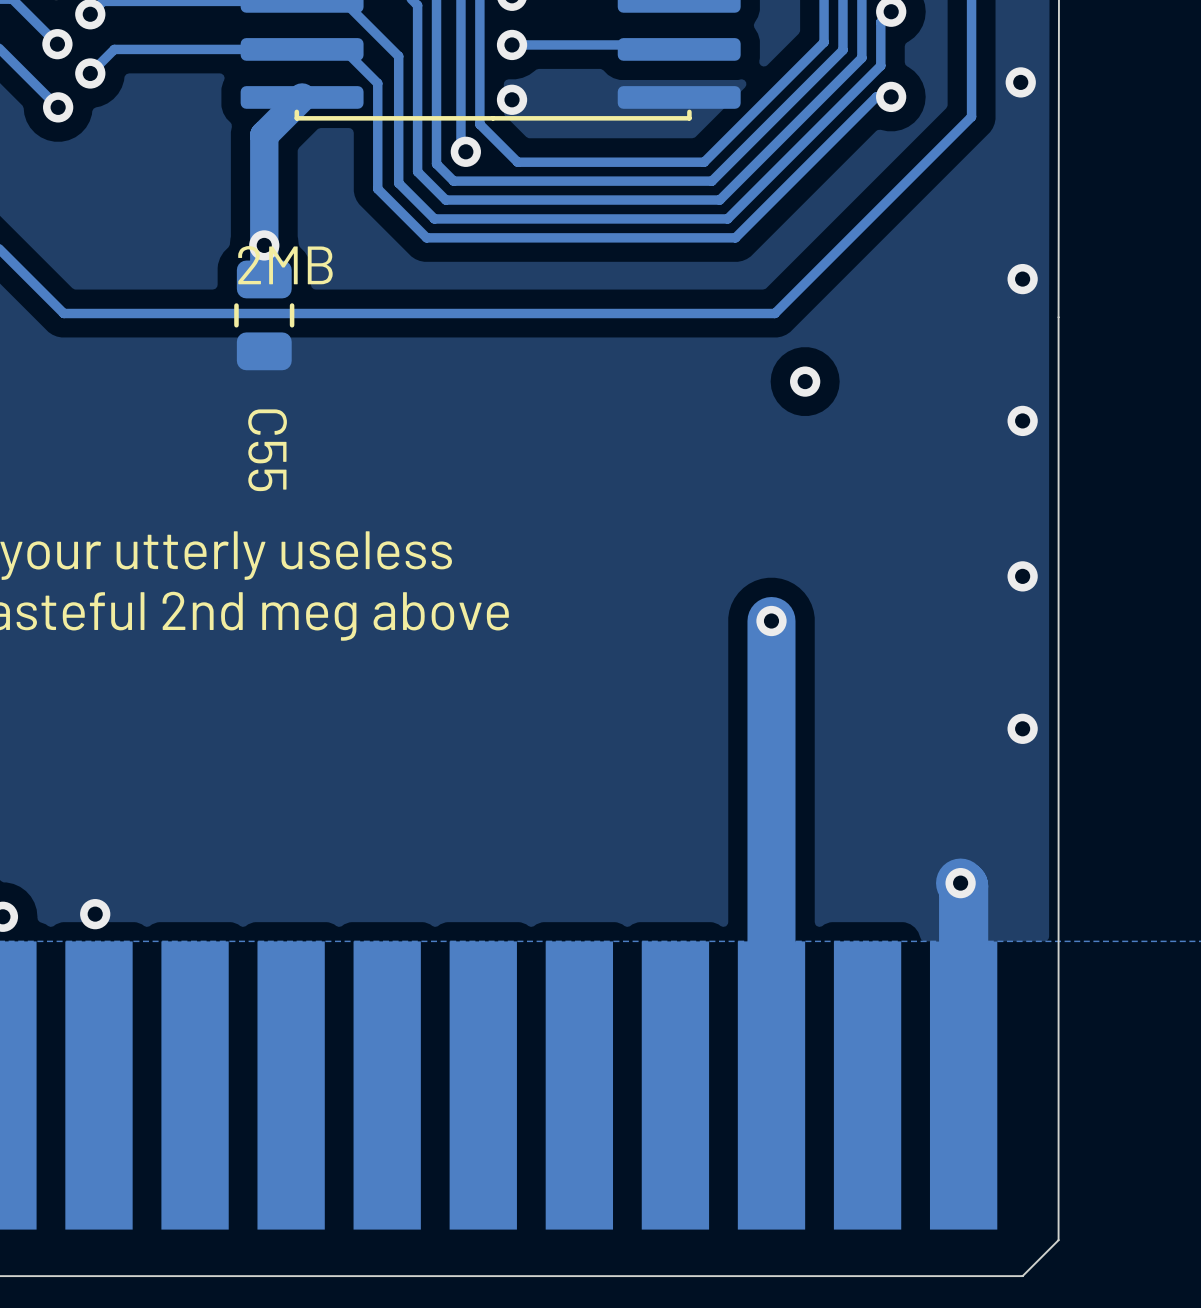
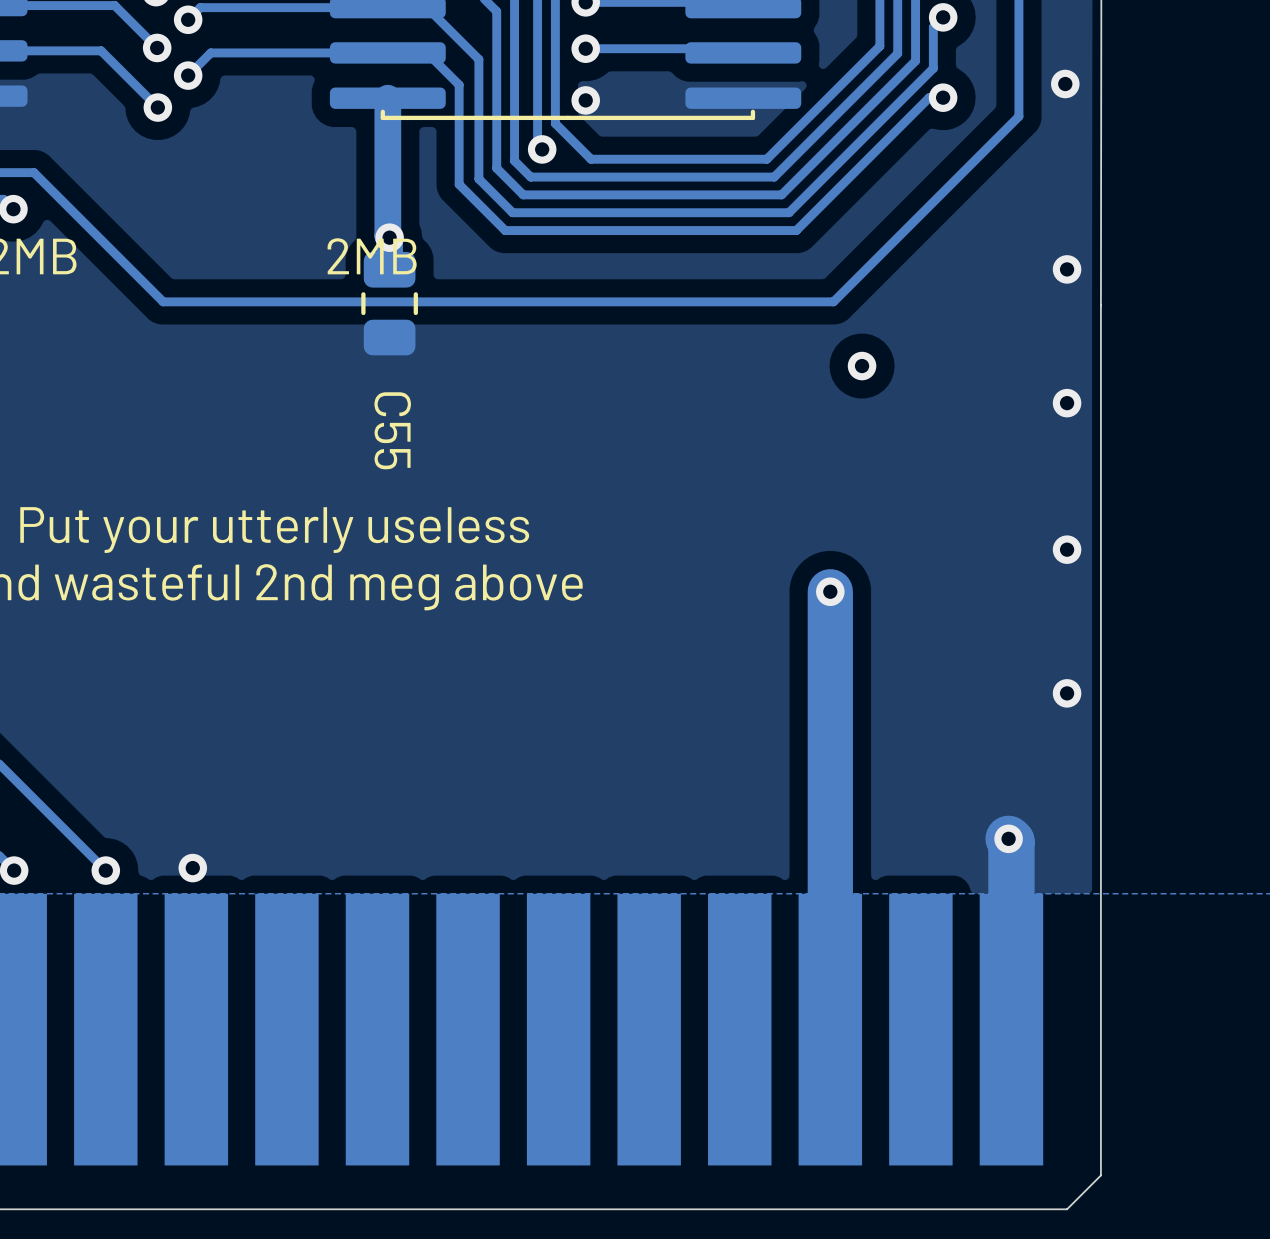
track: (302, 97) (264, 135) (264, 279) -> (387, 98) (389, 269)
via position: (264, 245) -> (389, 237)
C55 position: (264, 315) -> (389, 303)

